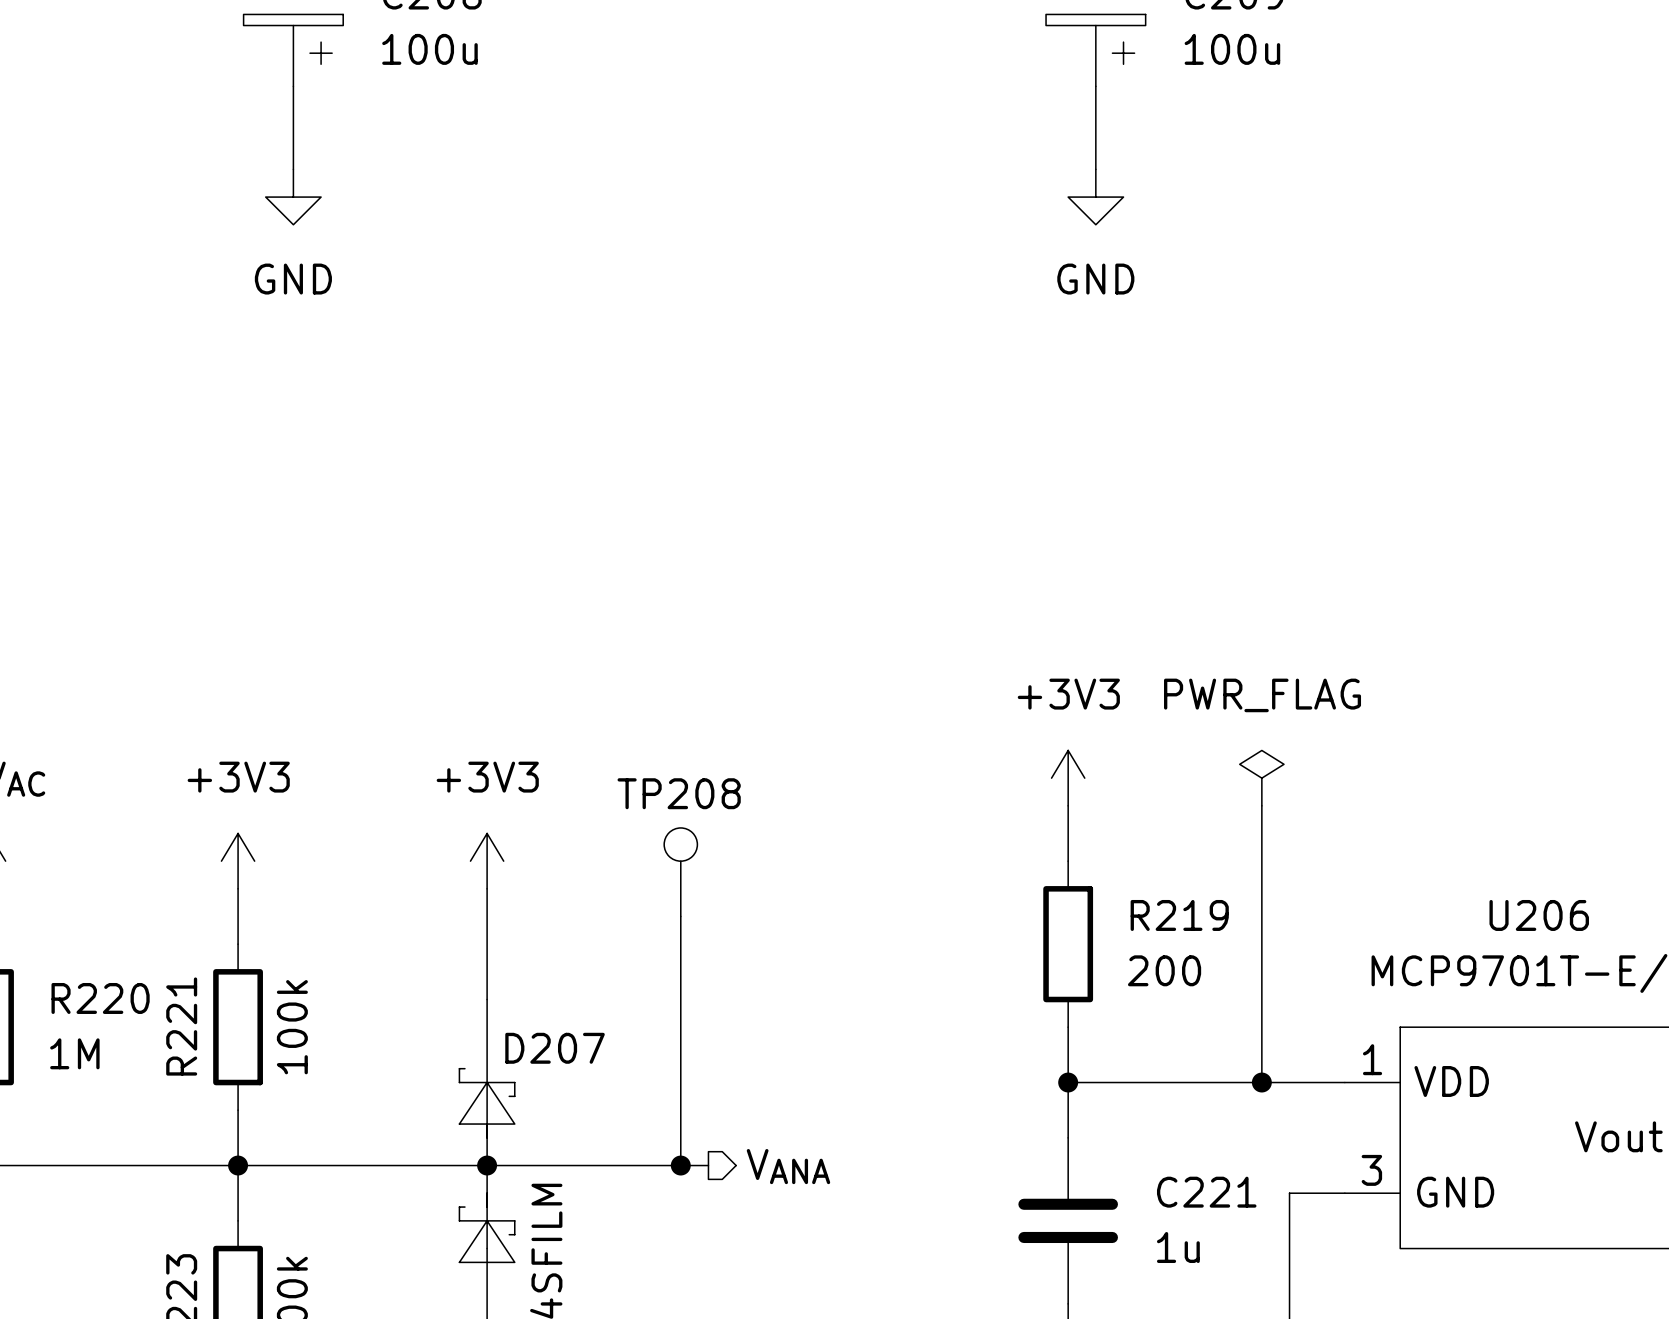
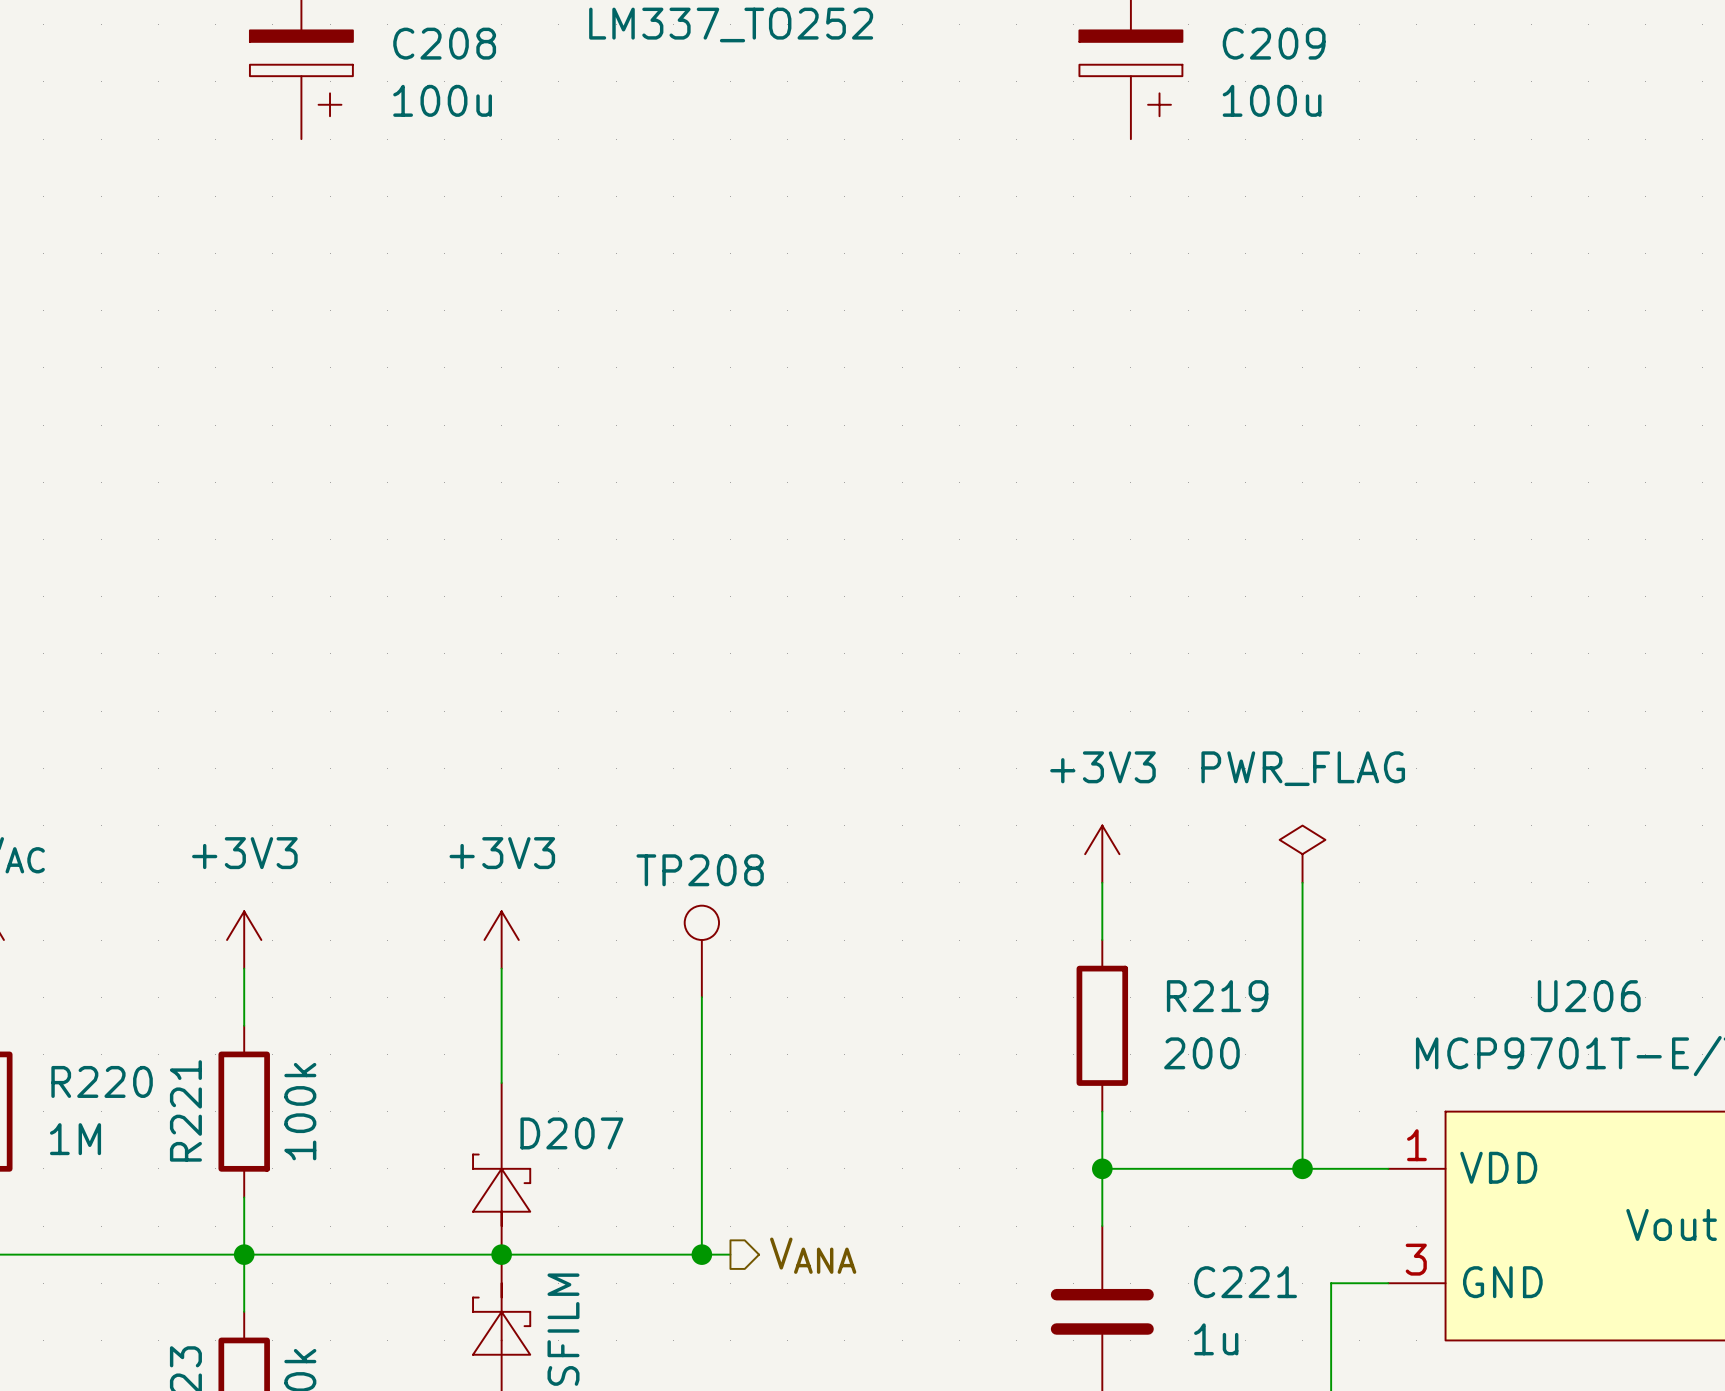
wire: (293, 86) (293, 169) -> none
wire: (1095, 86) (1095, 169) -> none
power symbol: GND (293, 197) -> none
power symbol: GND (1095, 197) -> none

